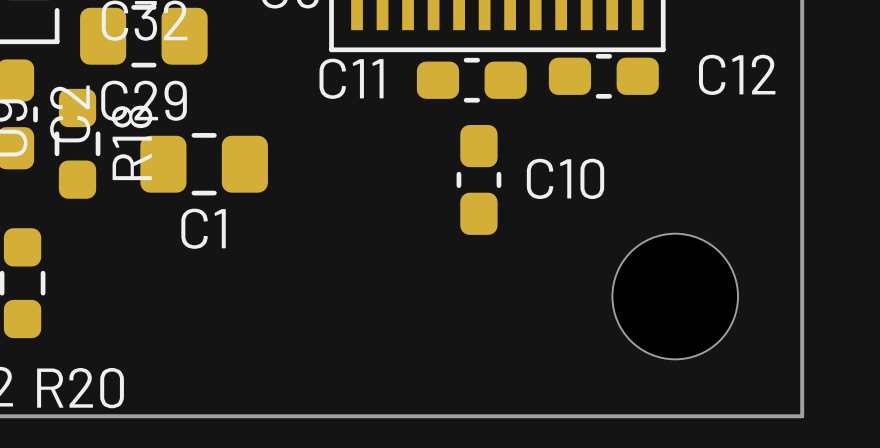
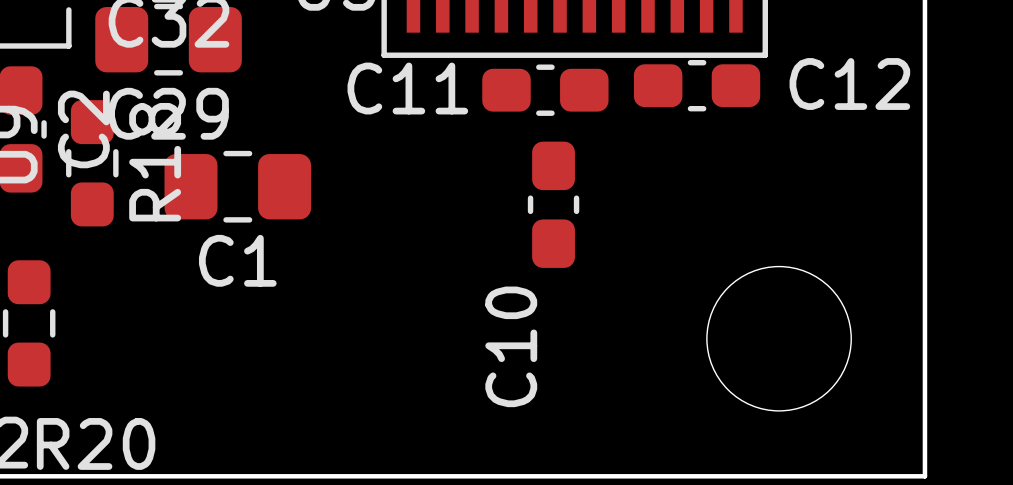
C10 name rotation: 0° (565, 178) -> 90° counterclockwise (511, 346)
C10 name position: C10 (565, 178) -> C10 (511, 346)

